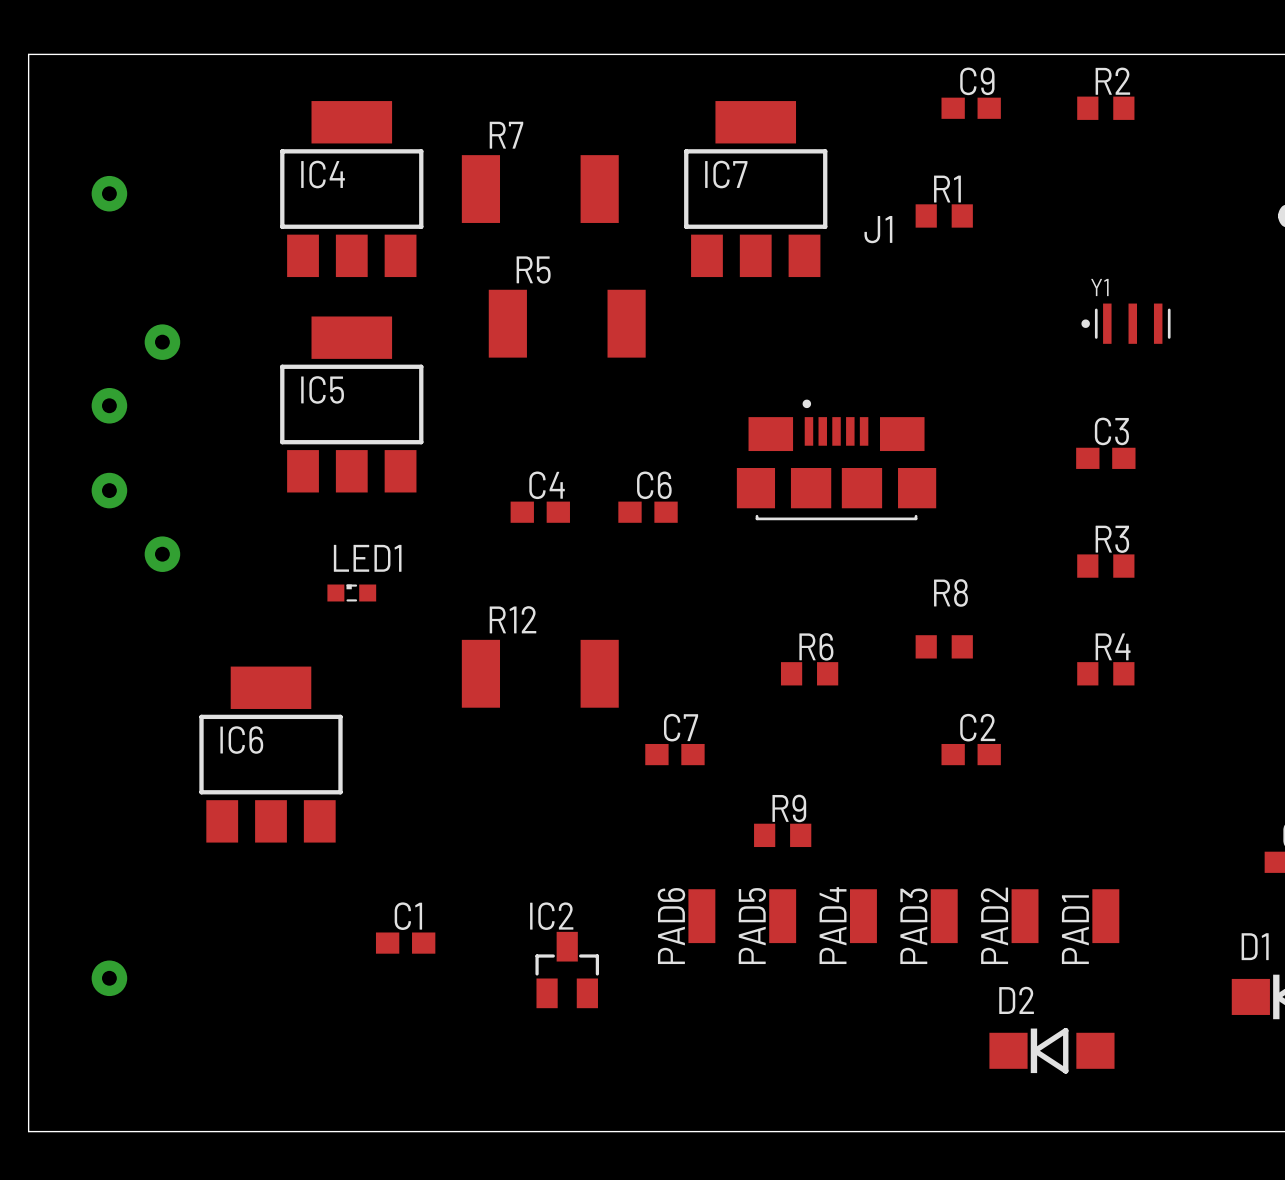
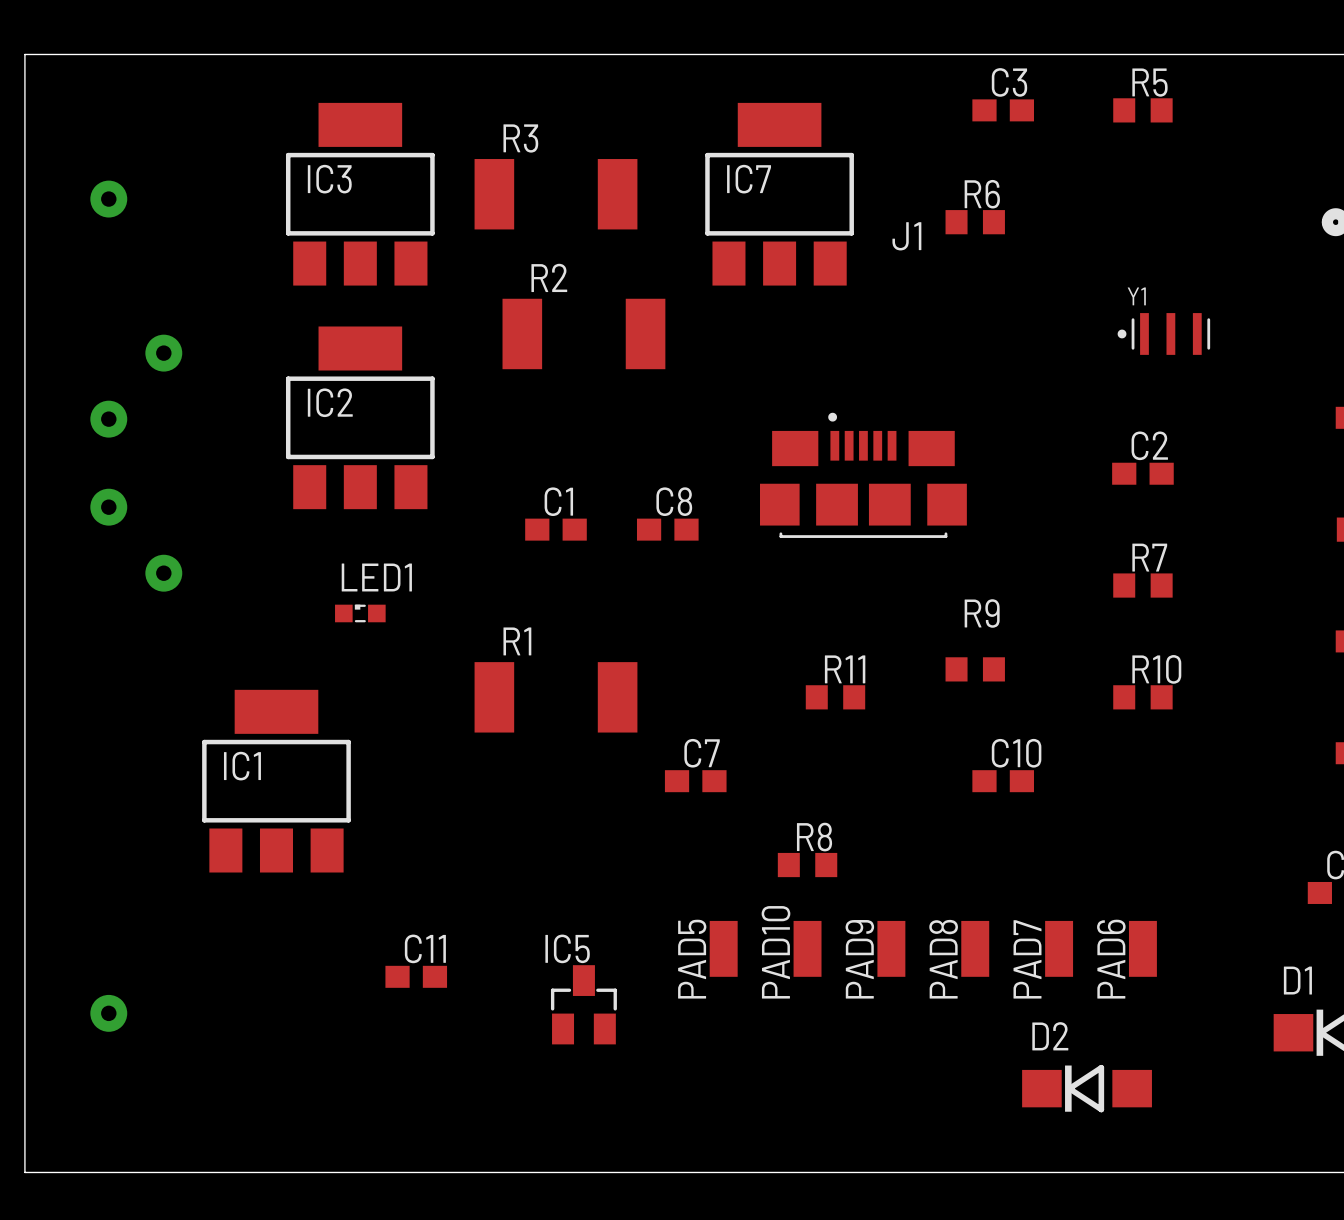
C9 name: C9 (977, 81) -> C3 (1009, 82)
R2 name: R2 (1112, 81) -> R5 (1149, 82)
R7 name: R7 (506, 135) -> R3 (520, 138)
IC4 name: IC4 (323, 174) -> IC3 (329, 179)
R1 name: R1 (947, 189) -> R6 (982, 194)
R5 name: R5 (533, 269) -> R2 (549, 277)
IC5 name: IC5 (322, 389) -> IC2 (330, 402)
C3 name: C3 (1111, 431) -> C2 (1149, 445)
C4 name: C4 (547, 485) -> C1 (558, 501)
C6 name: C6 (654, 485) -> C8 (674, 501)
R3 name: R3 (1112, 539) -> R7 (1149, 557)
R8 name: R8 (950, 592) -> R9 (982, 613)
R12 name: R12 (512, 619) -> R1 (517, 641)
R6 name: R6 (816, 646) -> R11 (845, 669)
R4 name: R4 (1113, 646) -> R10 (1156, 669)
C2 name: C2 (977, 727) -> C10 (1016, 753)
IC6 name: IC6 (241, 740) -> IC1 (242, 766)
R9 name: R9 (789, 808) -> R8 (814, 837)
C1 name: C1 (408, 916) -> C11 (425, 948)
IC2 name: IC2 (551, 916) -> IC5 (567, 948)
PAD4 name: PAD4 (833, 925) -> PAD9 (859, 959)
PAD2 name: PAD2 (994, 925) -> PAD7 (1027, 959)
PAD6 name: PAD6 (671, 926) -> PAD5 (692, 959)
PAD5 name: PAD5 (752, 926) -> PAD10 (775, 952)
PAD3 name: PAD3 (913, 926) -> PAD8 (943, 959)
PAD1 name: PAD1 (1075, 929) -> PAD6 (1111, 959)

